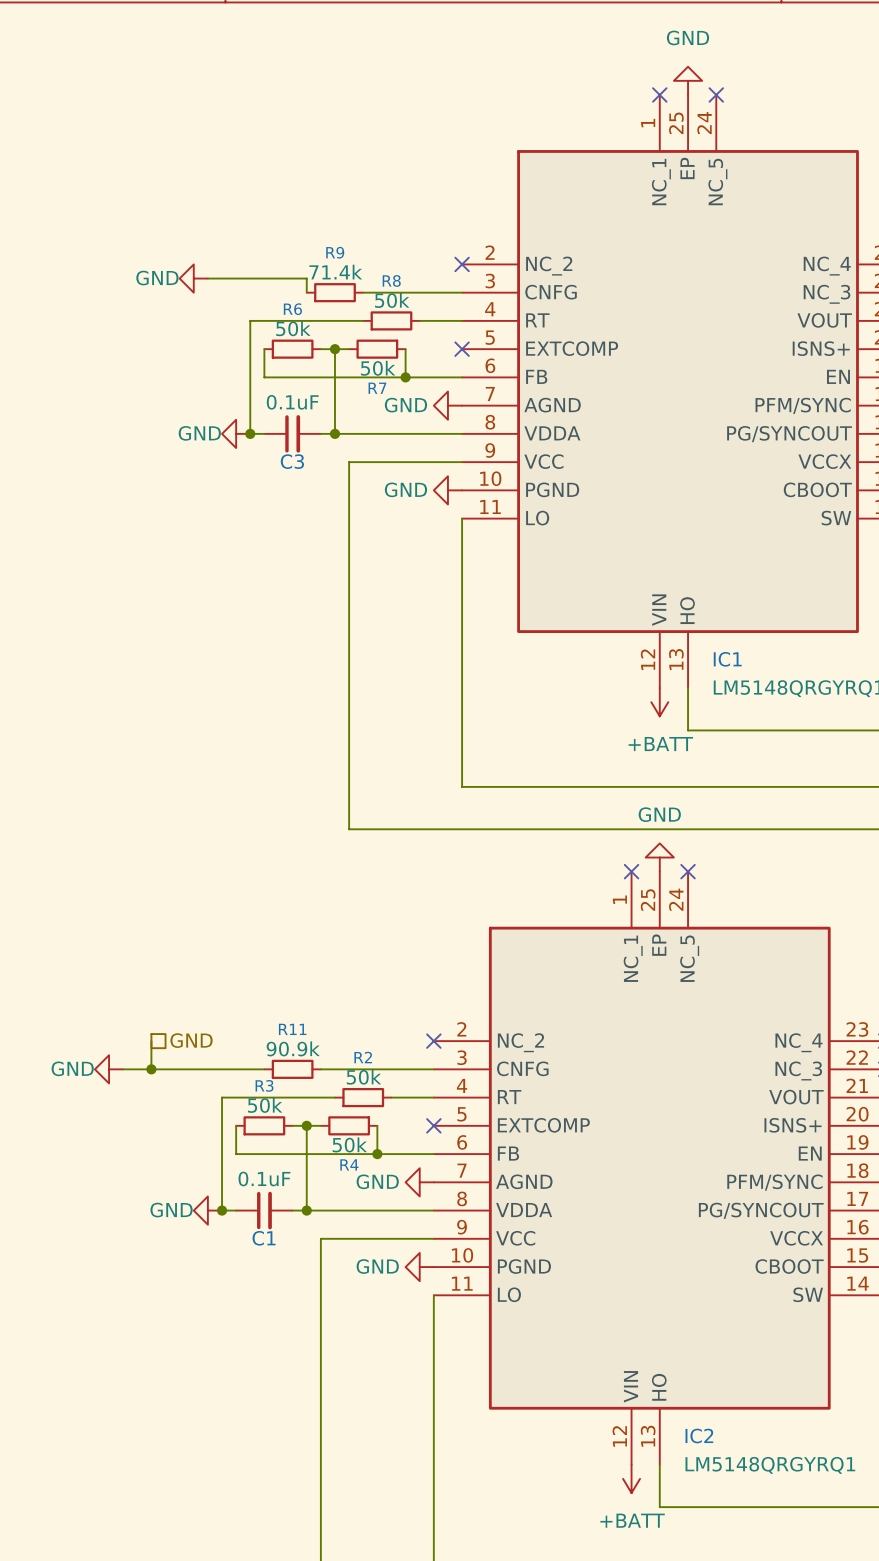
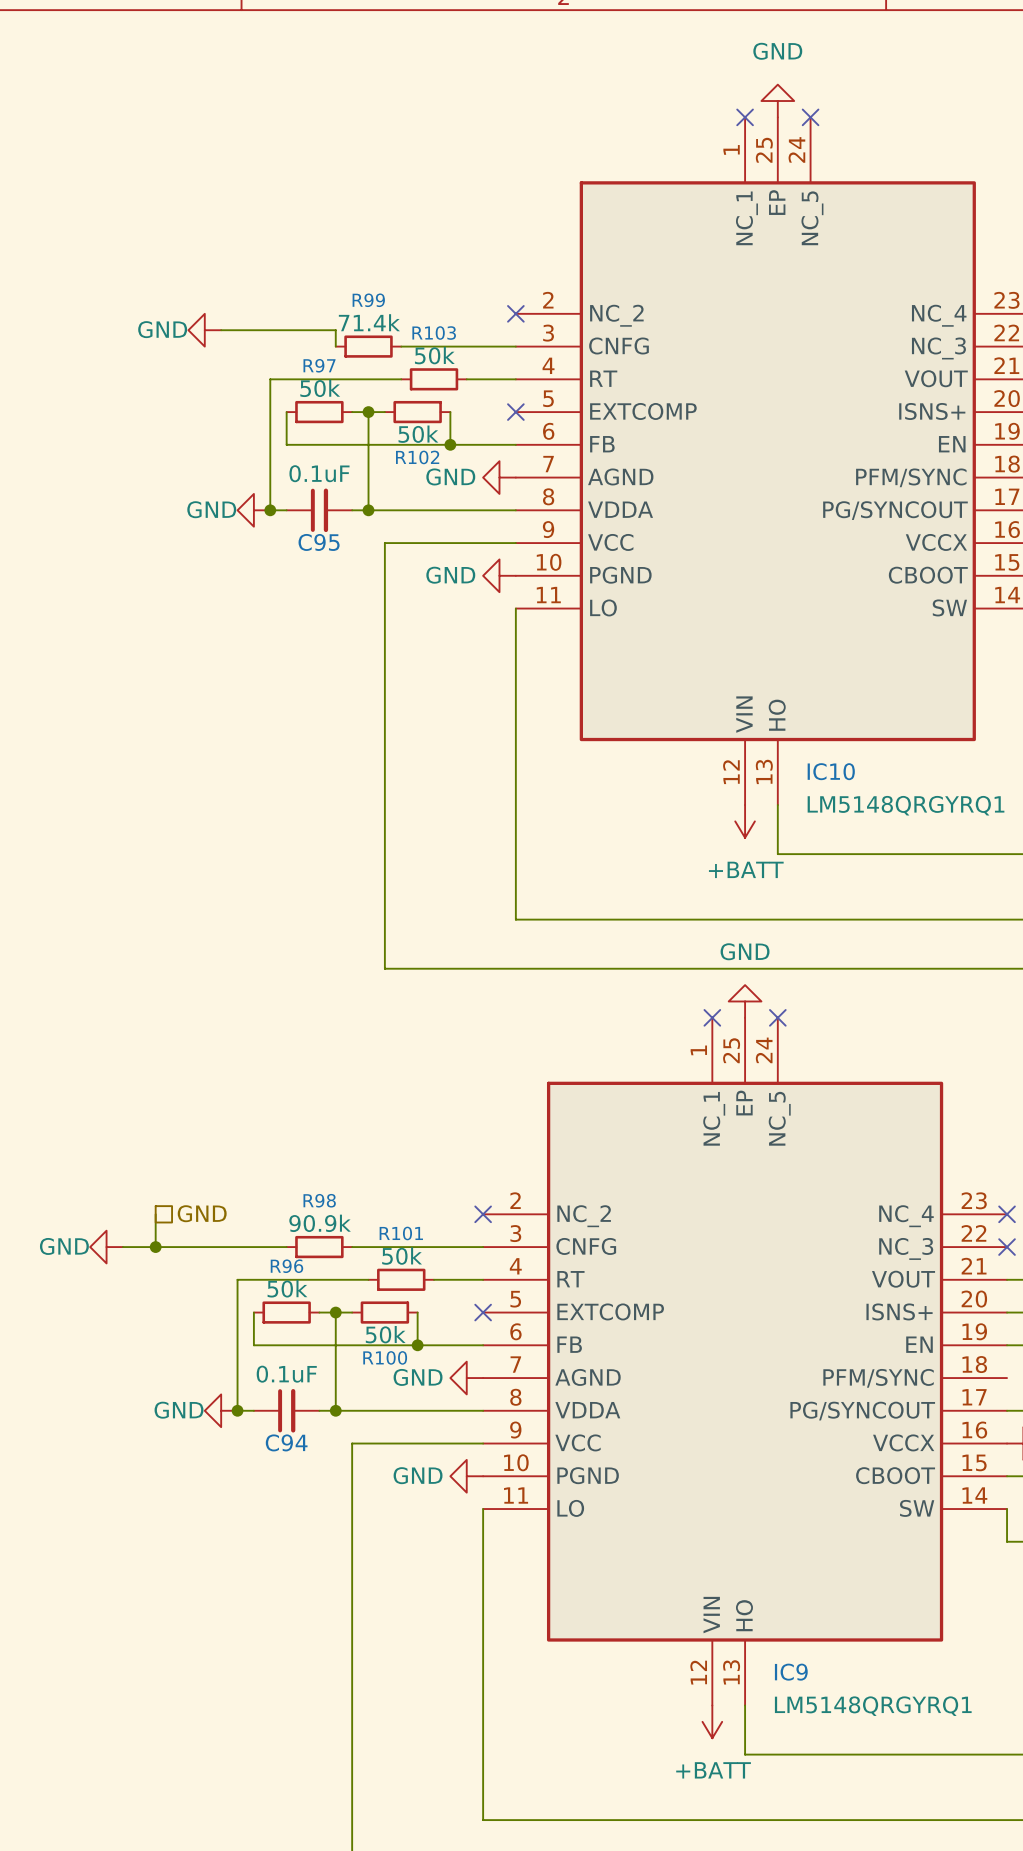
R9 name: R9 (335, 252) -> R99 (368, 300)
R8 name: R8 (391, 280) -> R103 (434, 333)
R6 name: R6 (292, 309) -> R97 (319, 365)
R7 name: R7 (377, 388) -> R102 (417, 457)
C3 name: C3 (292, 461) -> C95 (319, 542)
IC1 name: IC1 (727, 659) -> IC10 (831, 771)
R11 name: R11 (292, 1029) -> R98 (319, 1200)
R2 name: R2 (363, 1057) -> R101 (401, 1233)
R3 name: R3 (264, 1085) -> R96 (286, 1266)
R4 name: R4 (349, 1164) -> R100 (385, 1357)
C1 name: C1 (264, 1238) -> C94 (286, 1442)
IC2 name: IC2 (699, 1435) -> IC9 (791, 1672)

